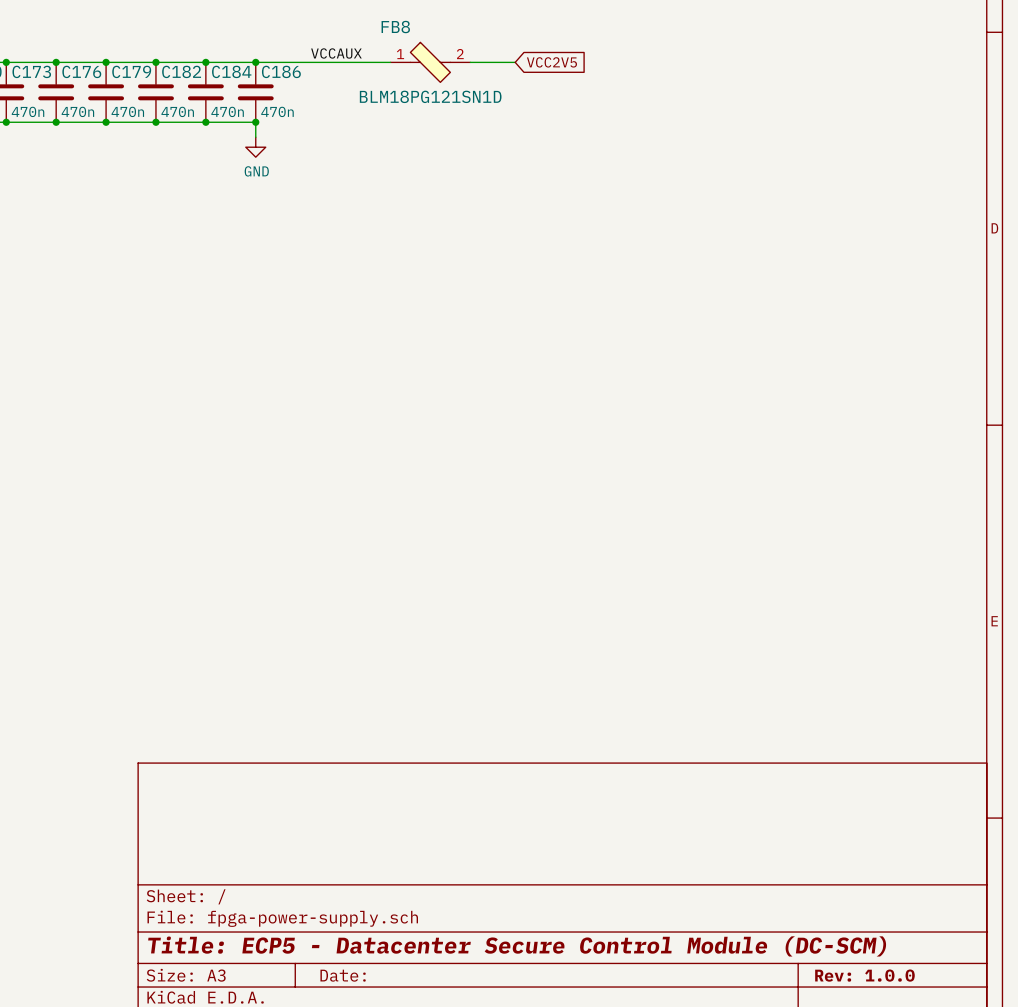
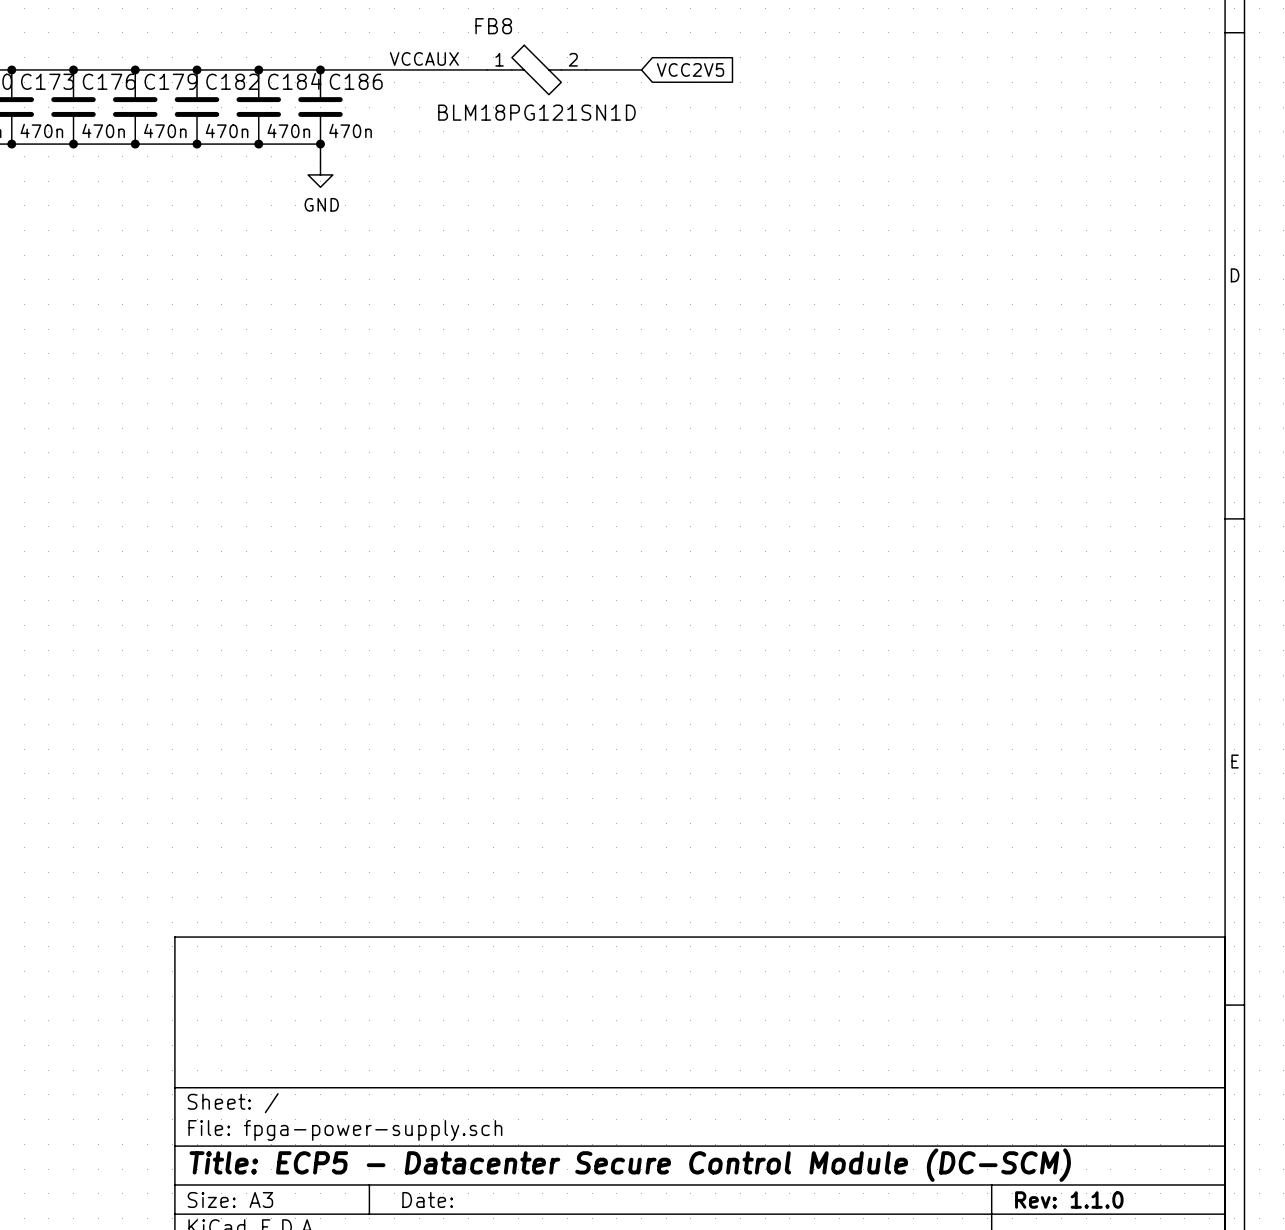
title block: Rev: 1.0.0 (864, 975) -> Rev: 1.1.0 (1069, 1199)

